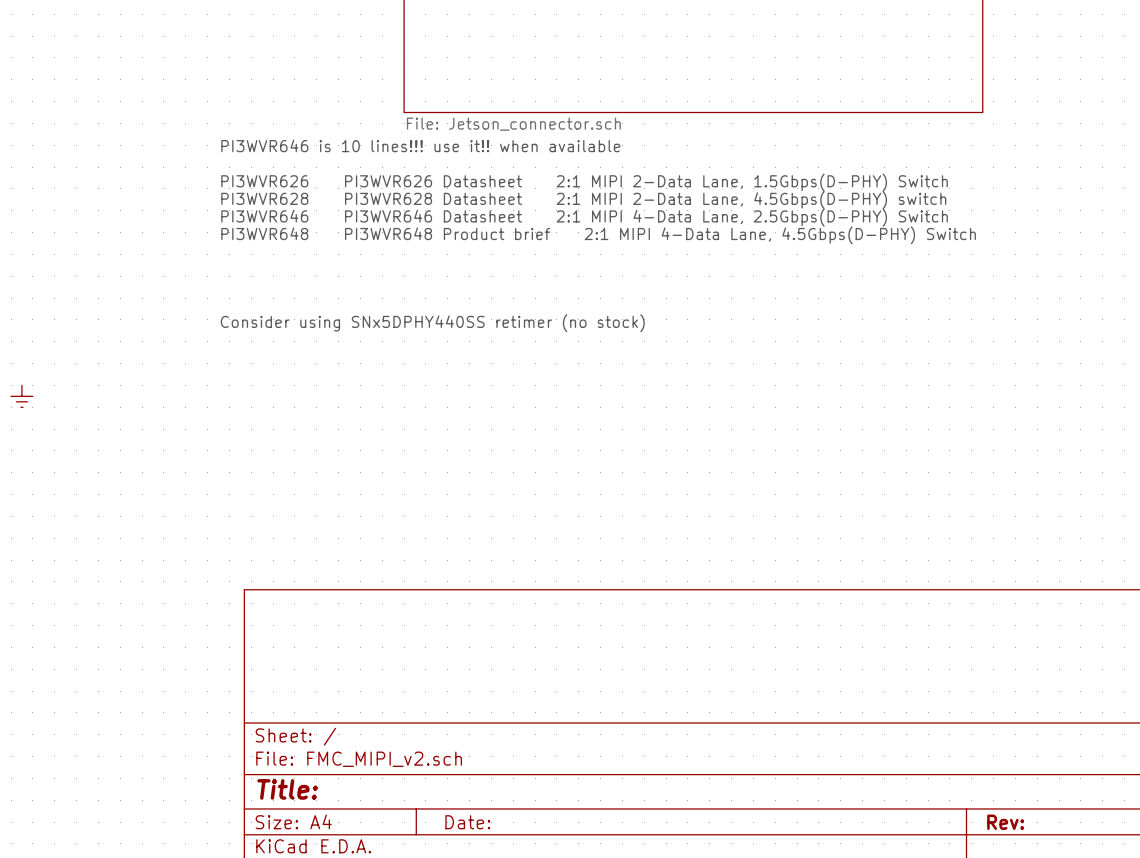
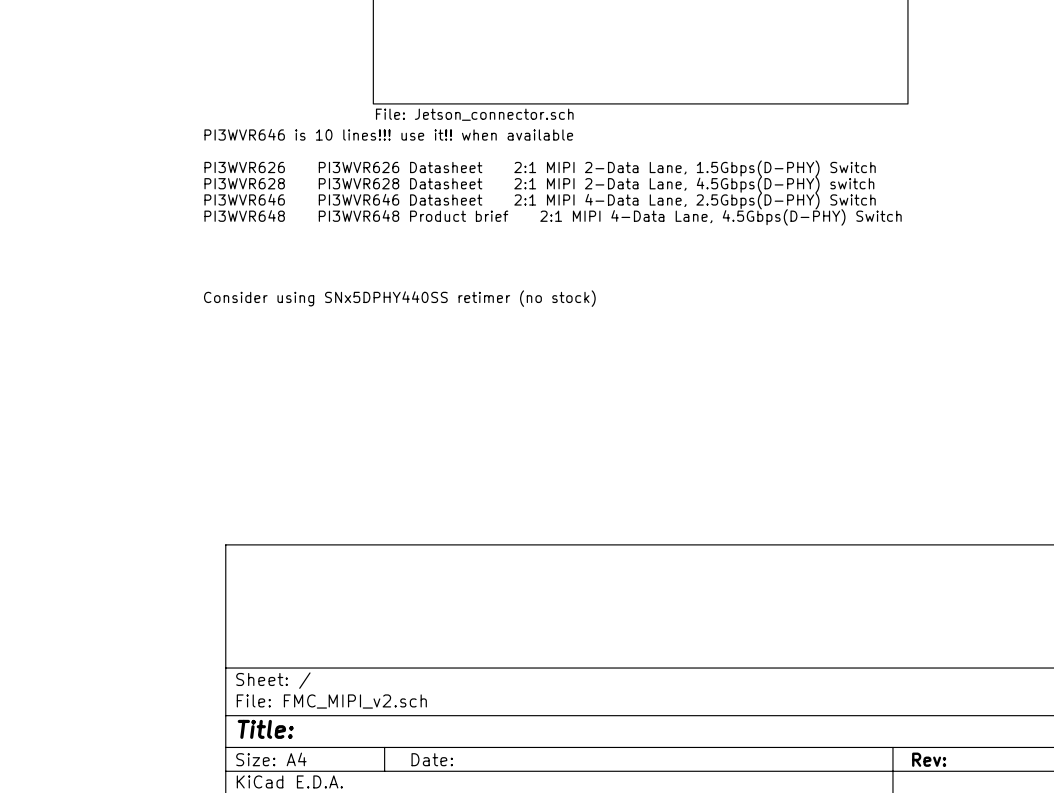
power symbol: (21, 396) -> none

